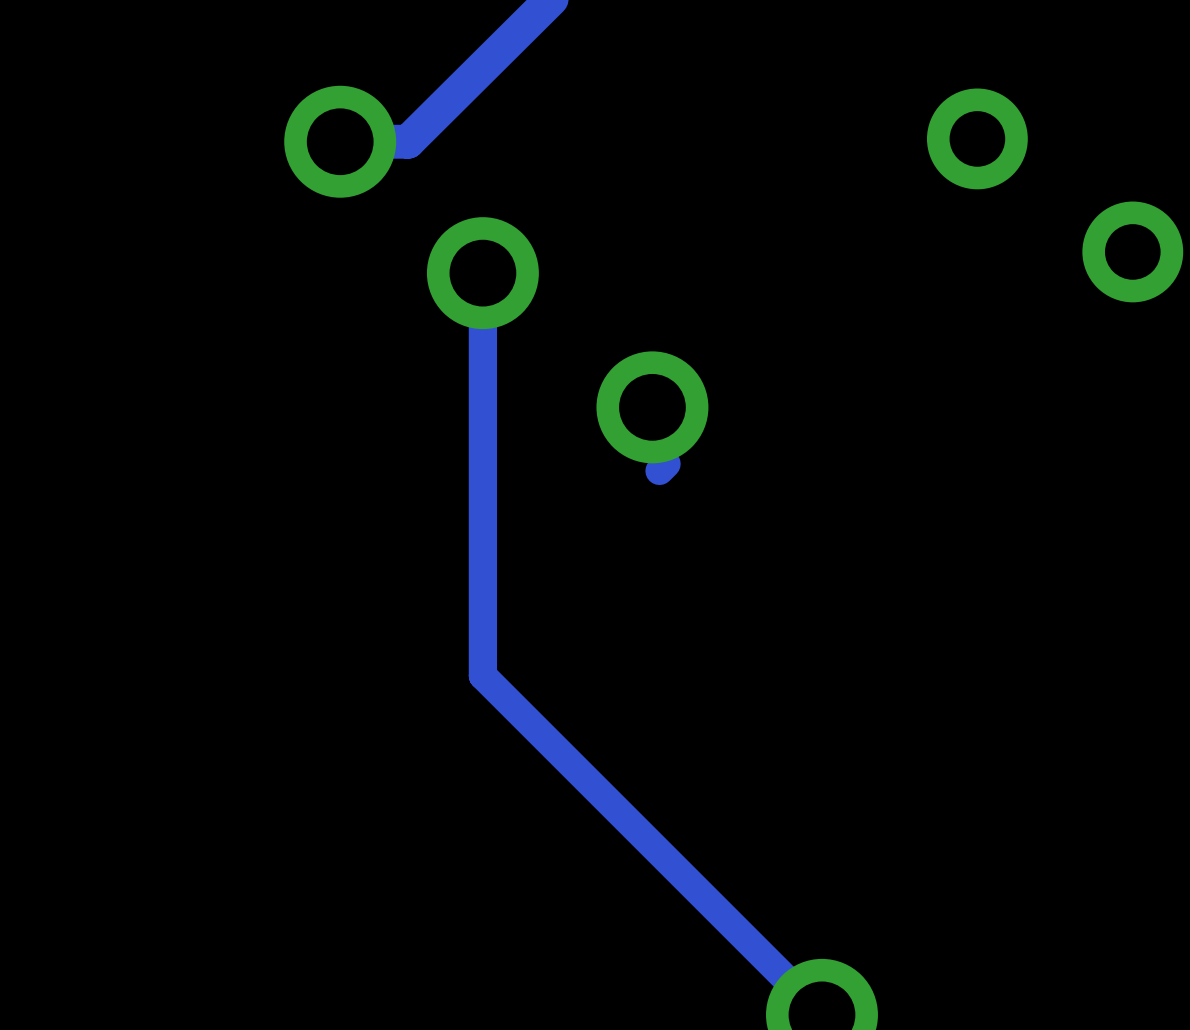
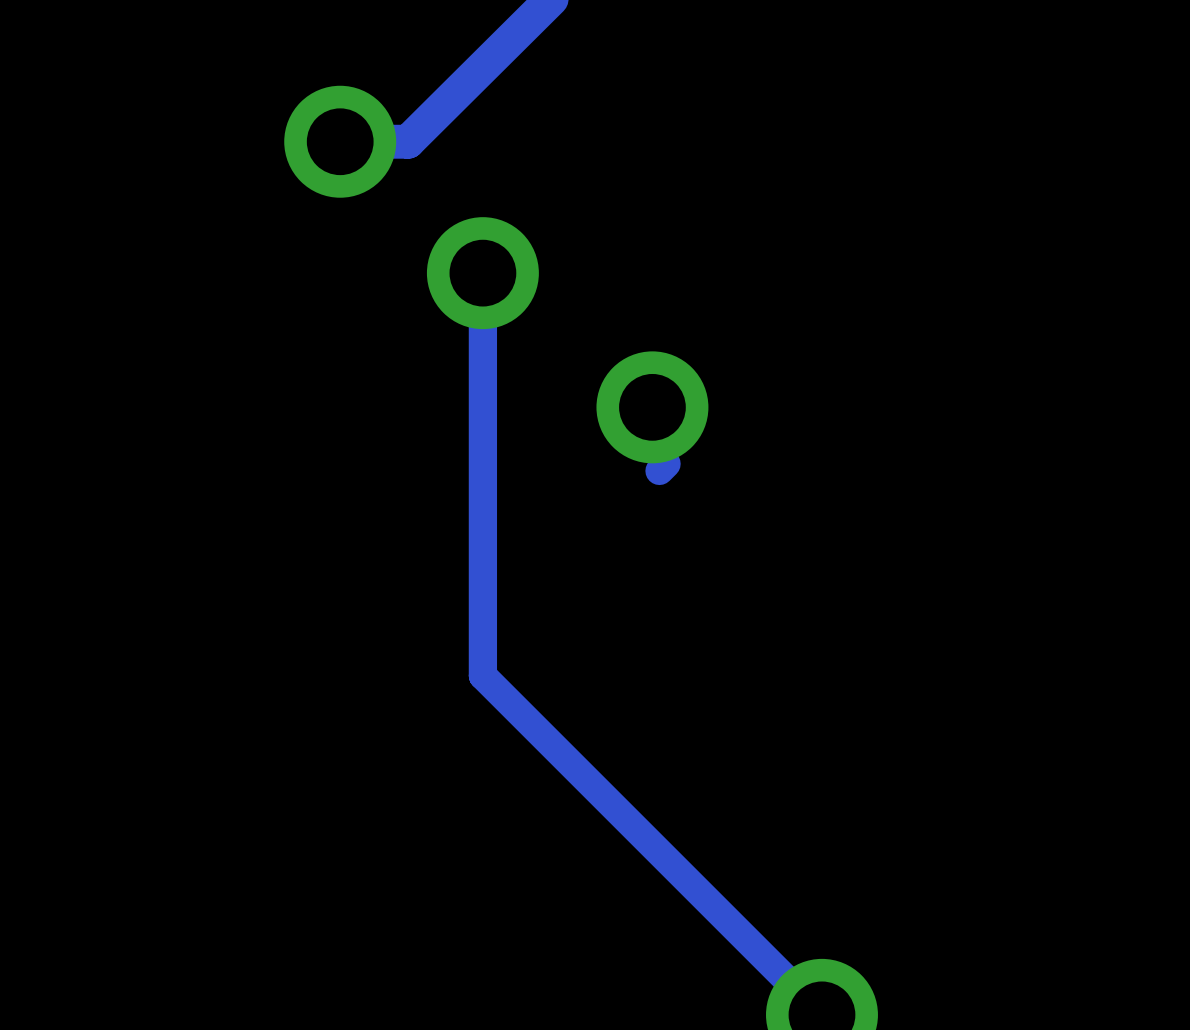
via: (977, 138) -> none
via: (1132, 251) -> none

